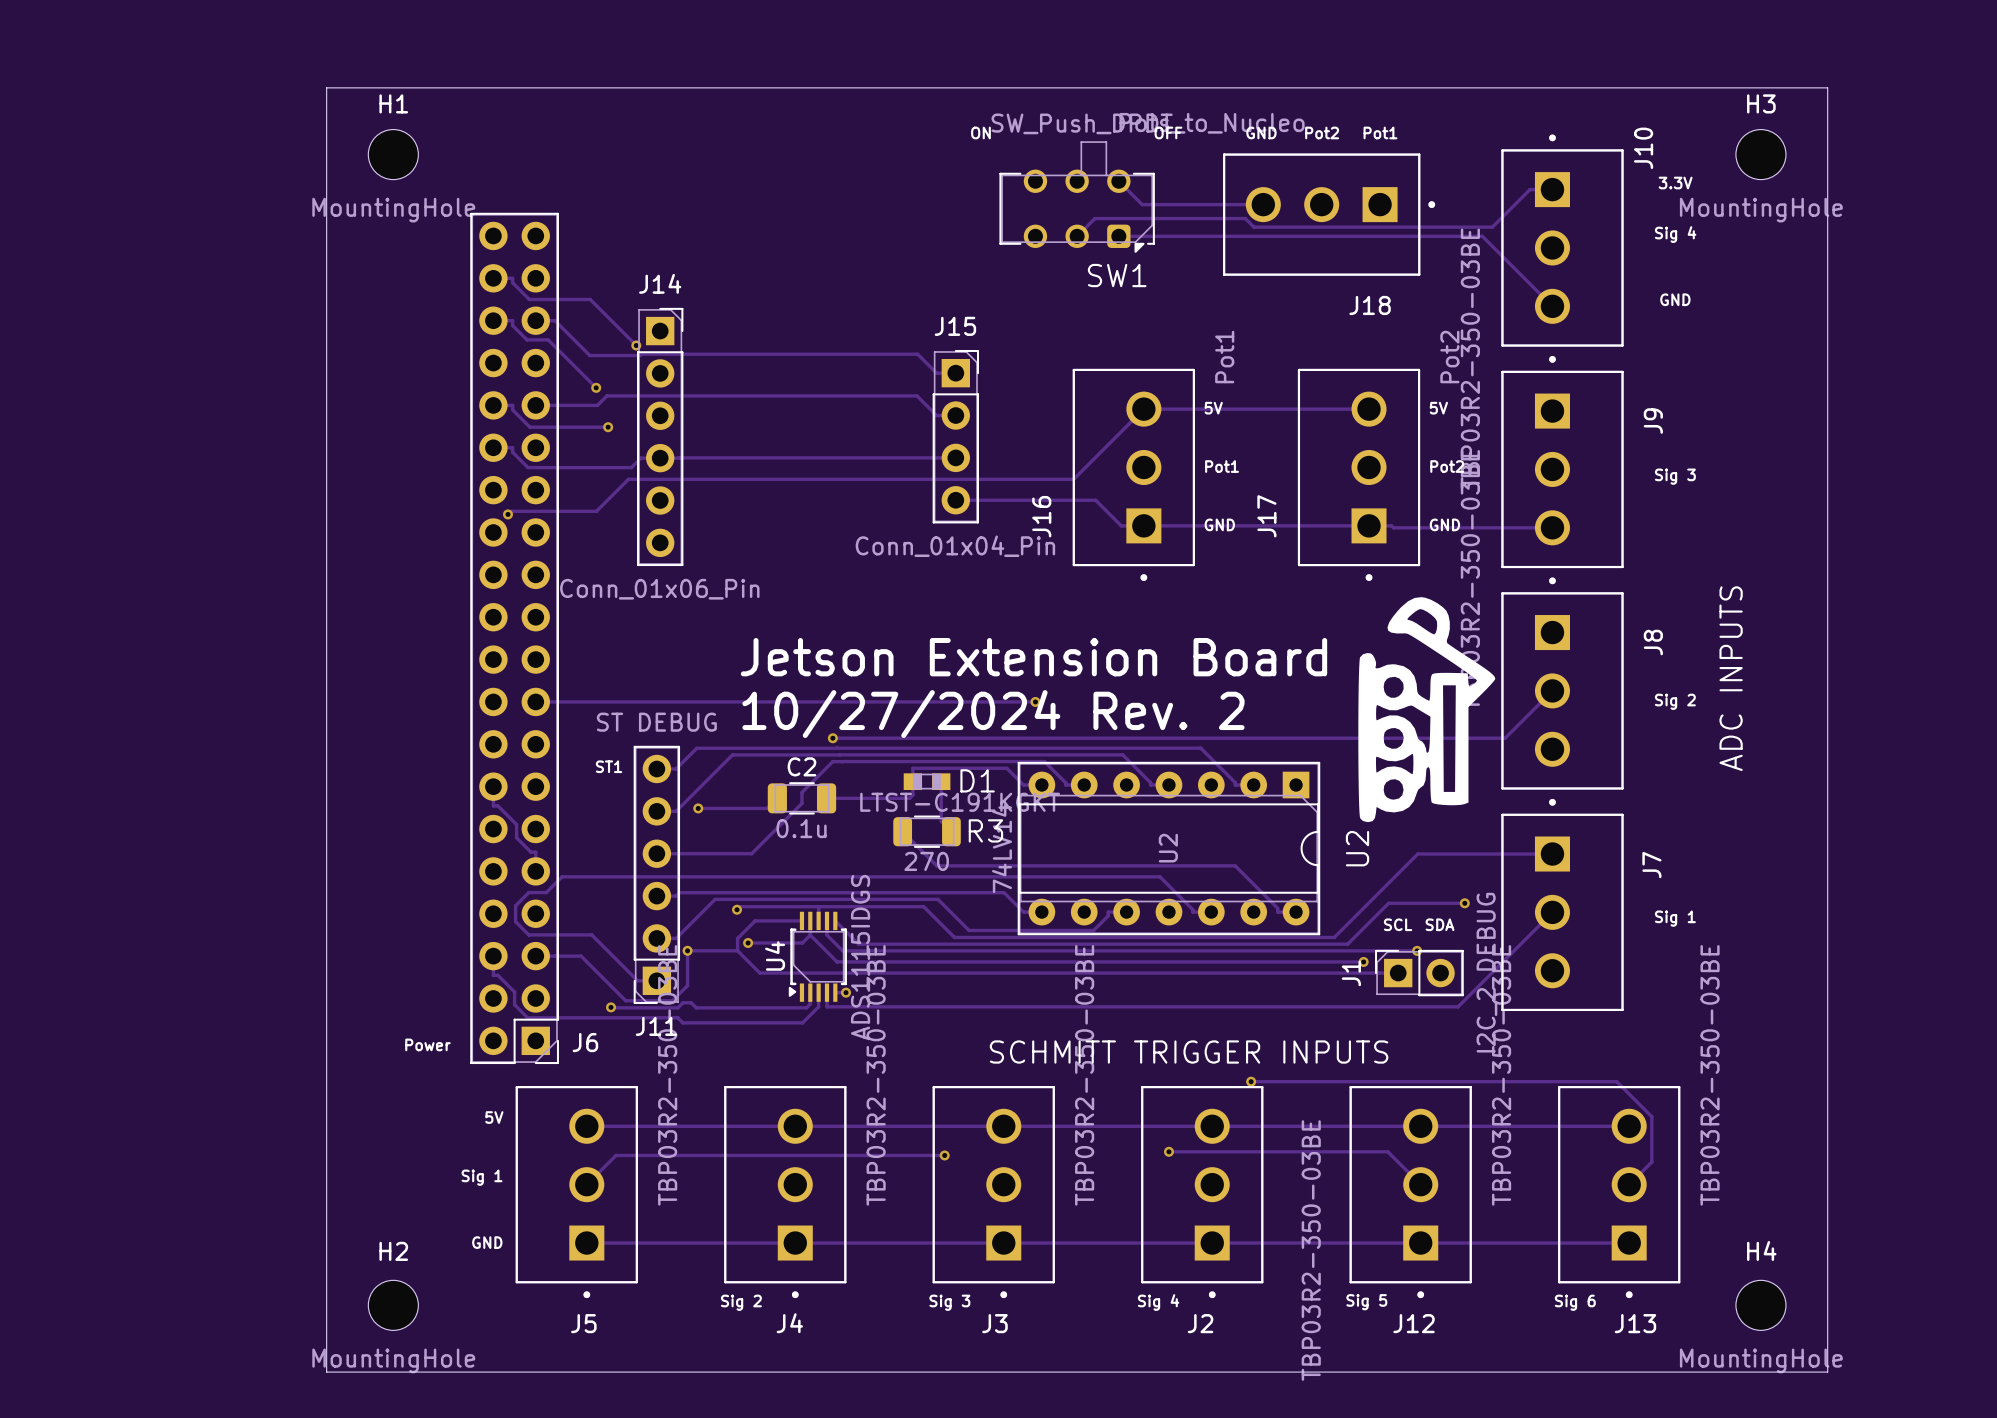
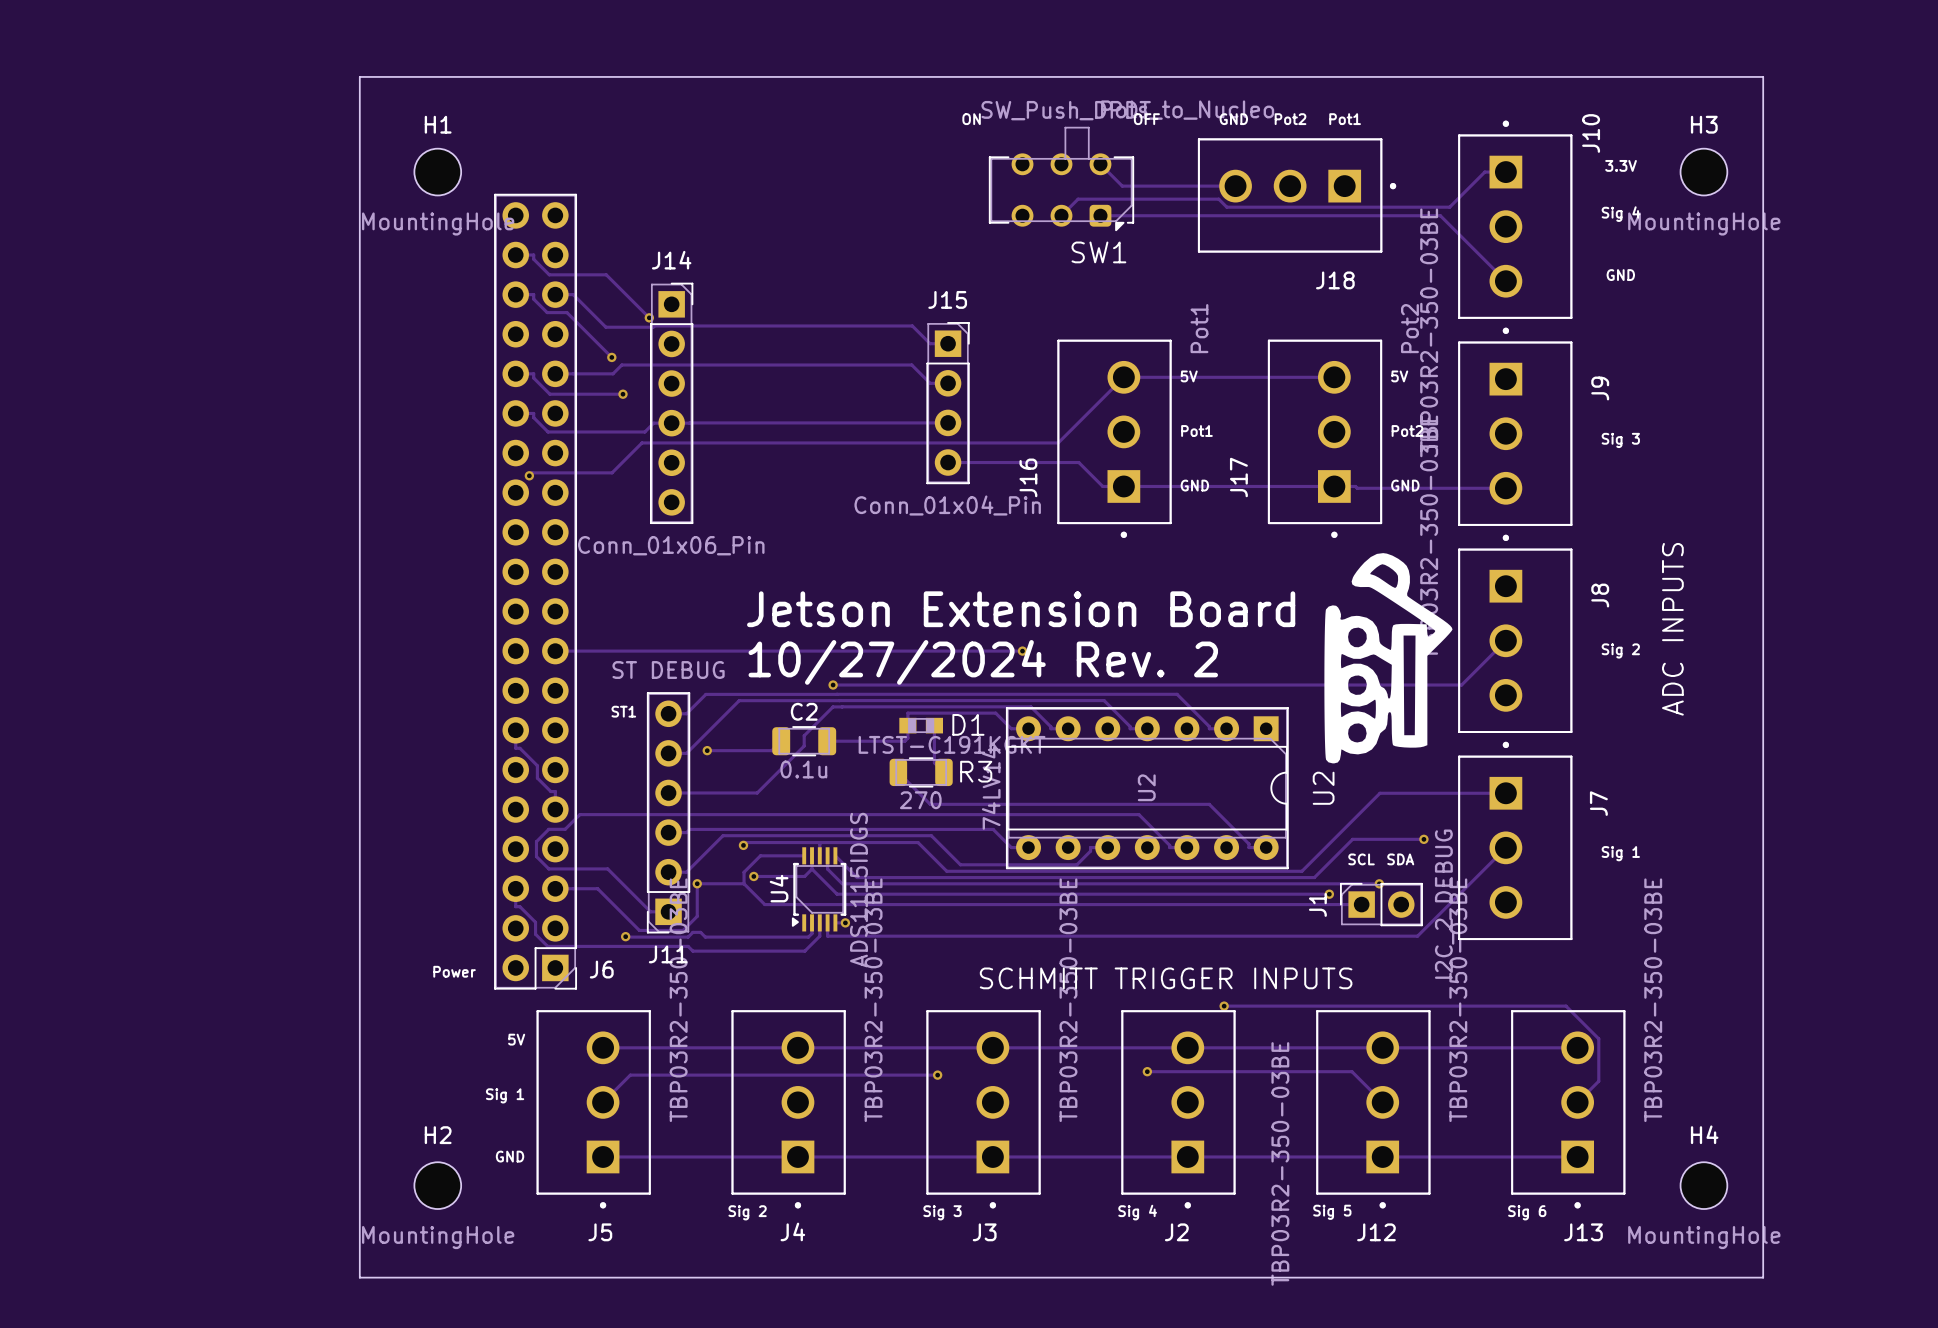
H1 position: (393, 154) -> (437, 172)
H3 position: (1760, 154) -> (1703, 172)
H2 position: (393, 1305) -> (437, 1185)
H4 position: (1760, 1305) -> (1703, 1185)

